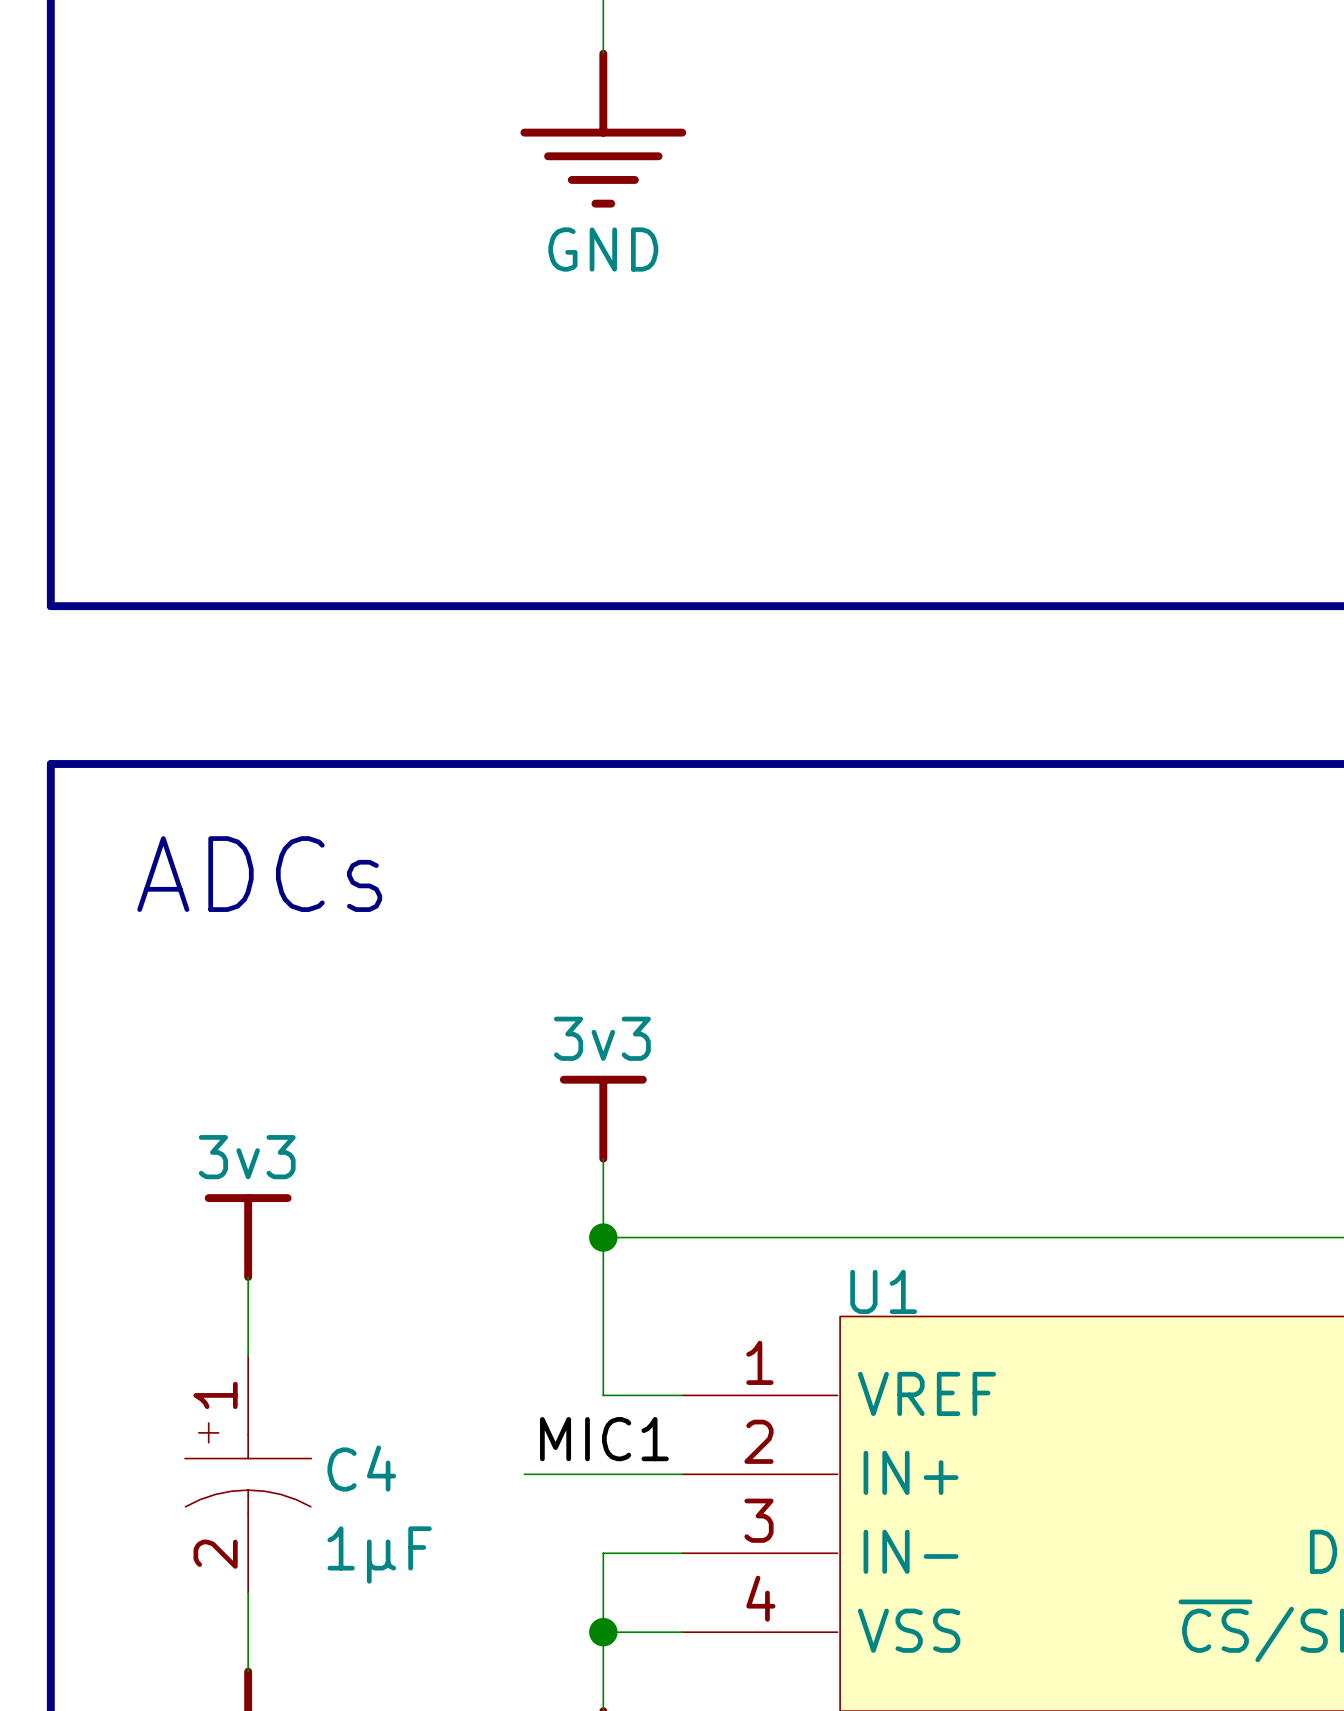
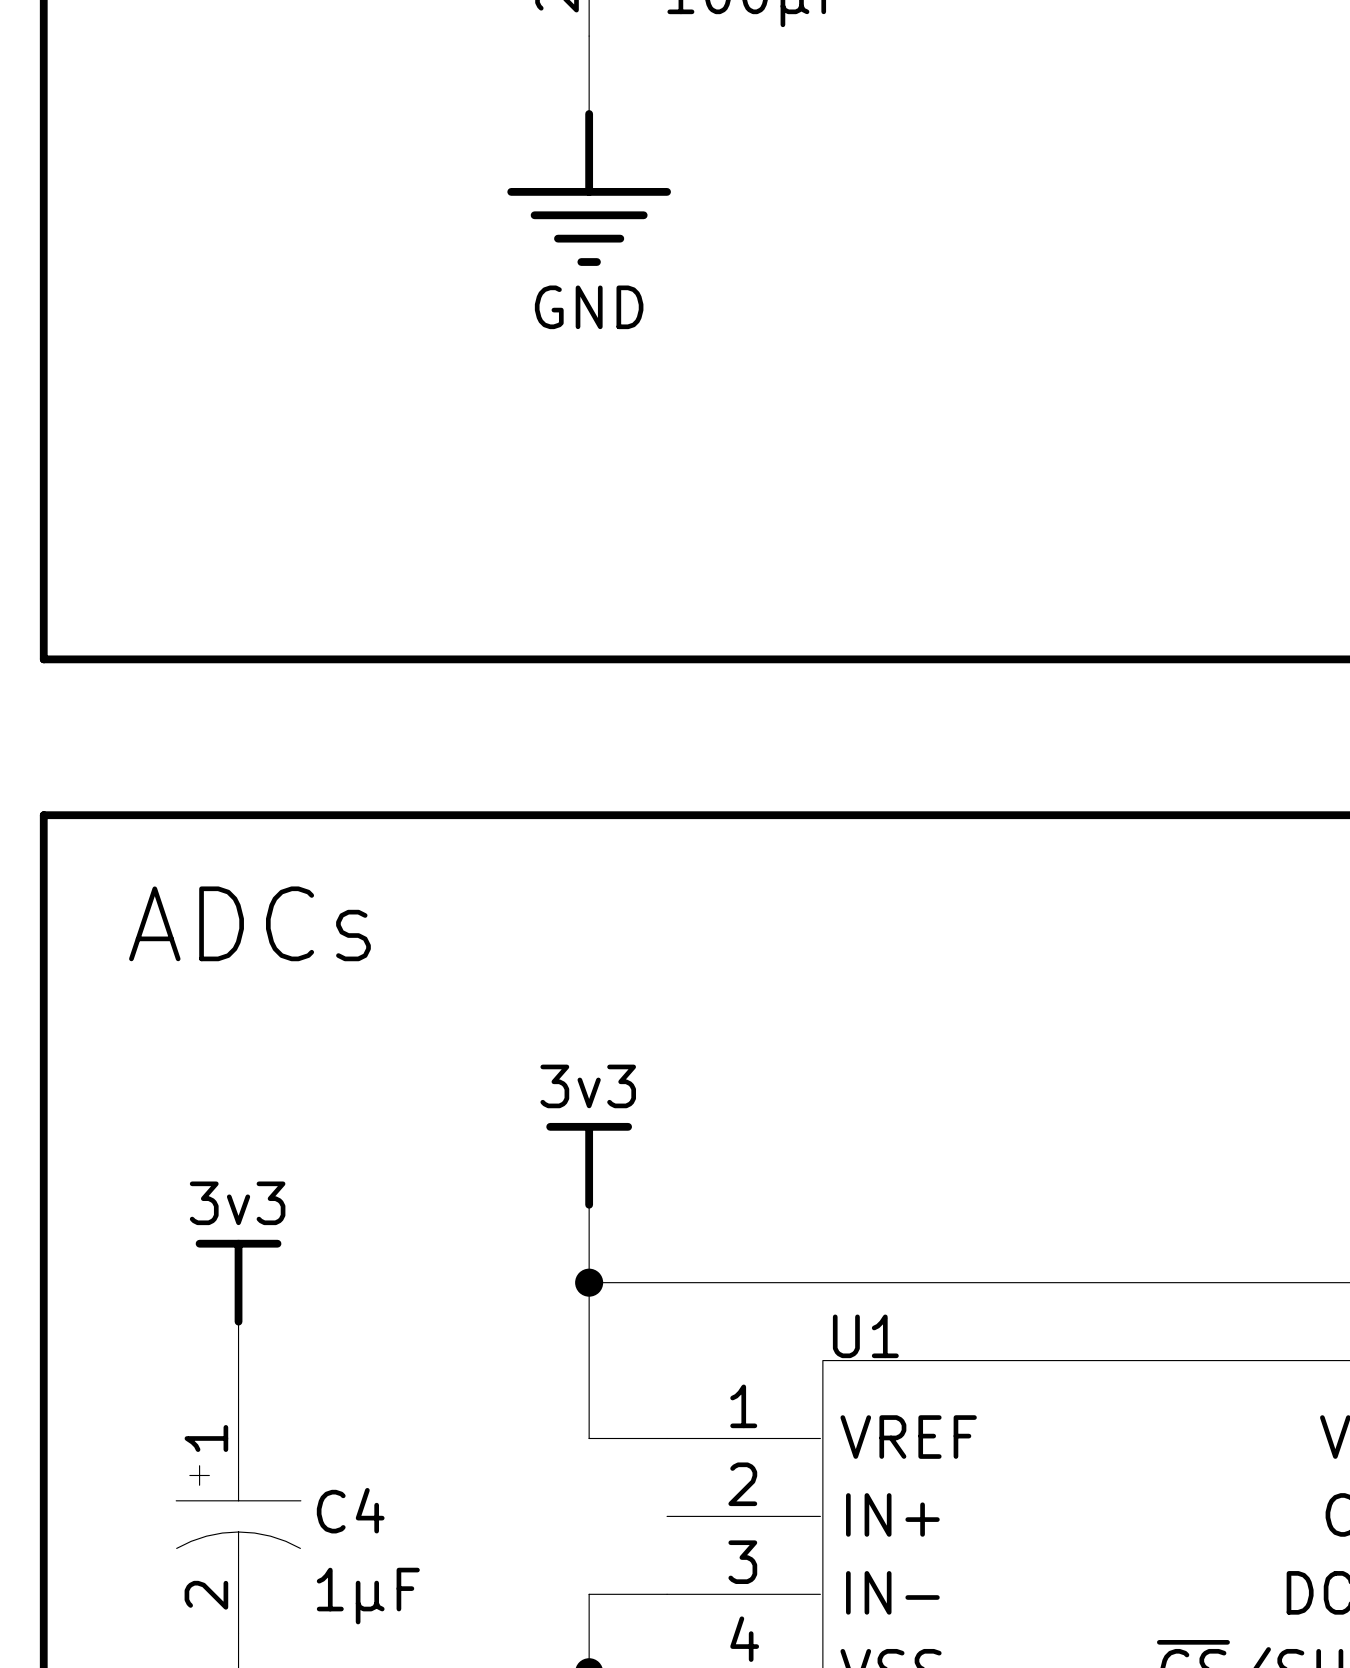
label: MIC1 (604, 1439) -> none
wire: (524, 1474) (682, 1474) -> none

